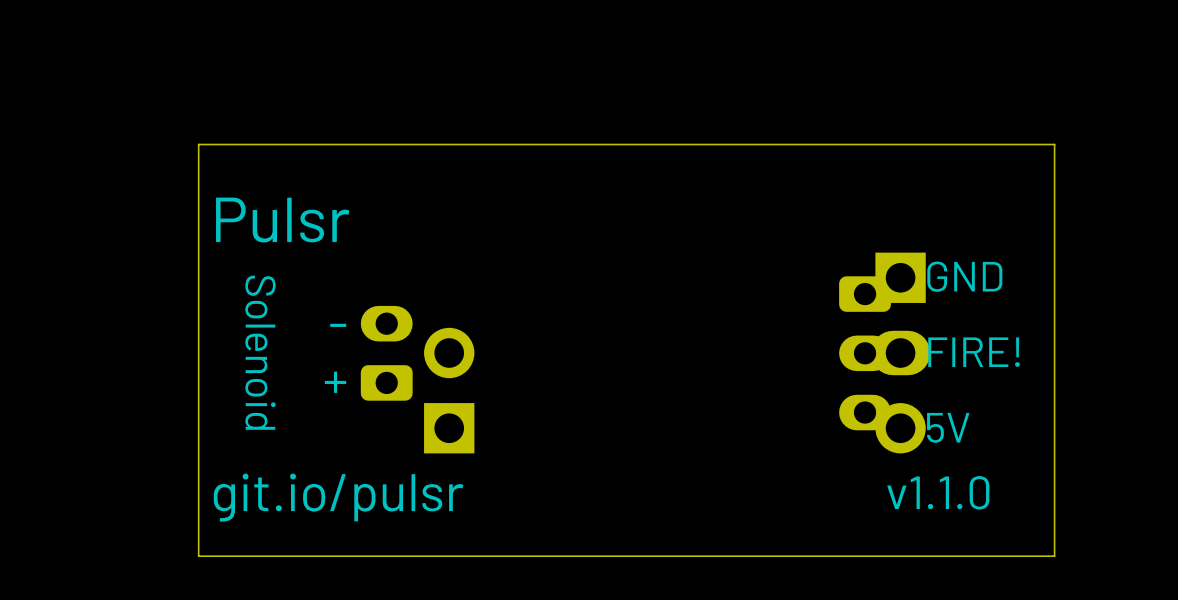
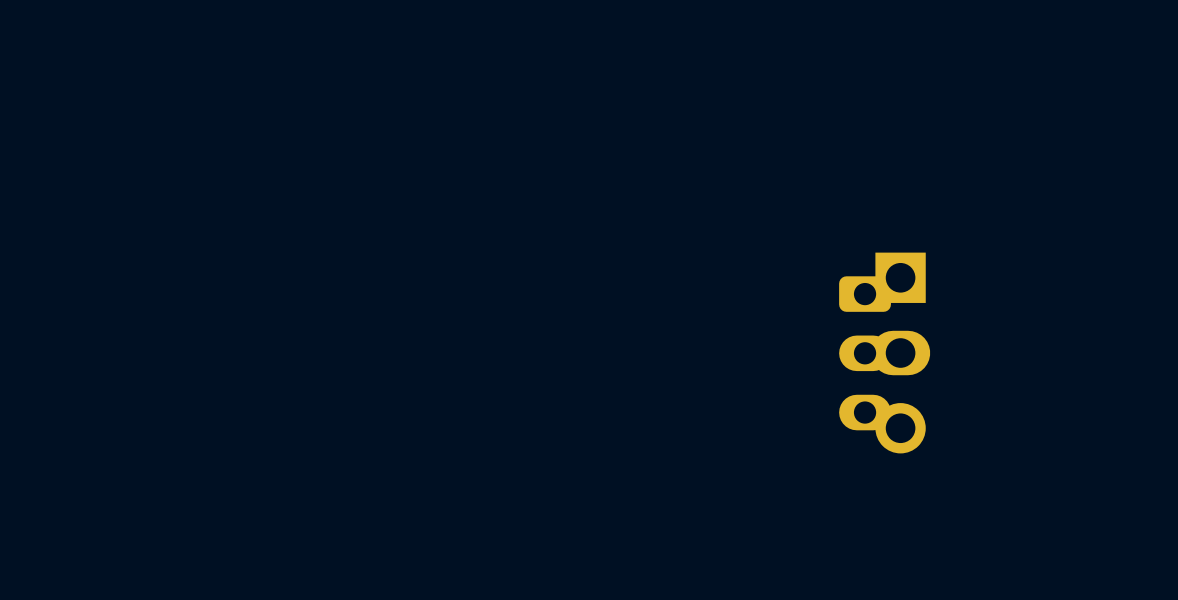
board edge: (1054, 144) (198, 144) (198, 556) (1054, 556) (1054, 144) -> none
text: Pulsr (282, 220) -> none
text: GND (964, 276) -> none
text: - (338, 325) -> none
text: Solenoid (260, 352) -> none
text: FIRE! (974, 352) -> none
part: (386, 353) -> none
text: + (335, 382) -> none
part: (449, 390) -> none
text: 5V (948, 427) -> none
text: v1.1.0 (938, 492) -> none
text: git.io/pulsr (338, 497) -> none

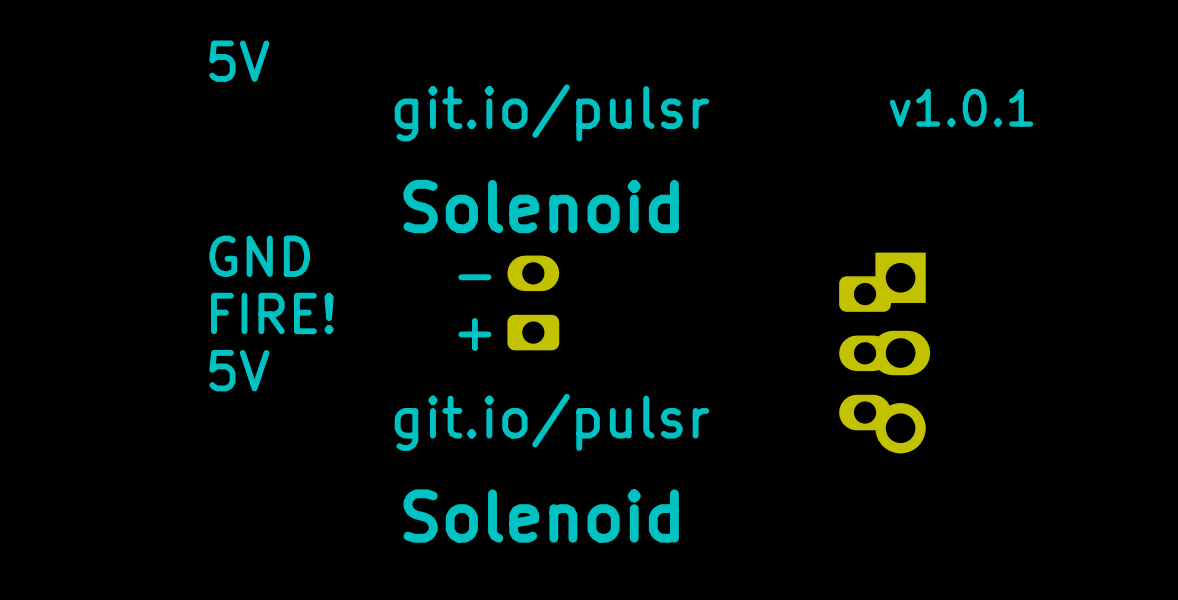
text: none -> 5V (239, 61)
text: none -> v1.0.1 (961, 107)
text: none -> git.io/pulsr (551, 112)
text: none -> Solenoid (541, 206)
text: none -> GND (259, 256)
text: none -> - (474, 277)
part: none -> (533, 302)
text: none -> FIRE! (272, 313)
text: none -> + (474, 334)
text: none -> 5V (239, 370)
text: none -> git.io/pulsr (551, 422)
text: none -> Solenoid (541, 516)

